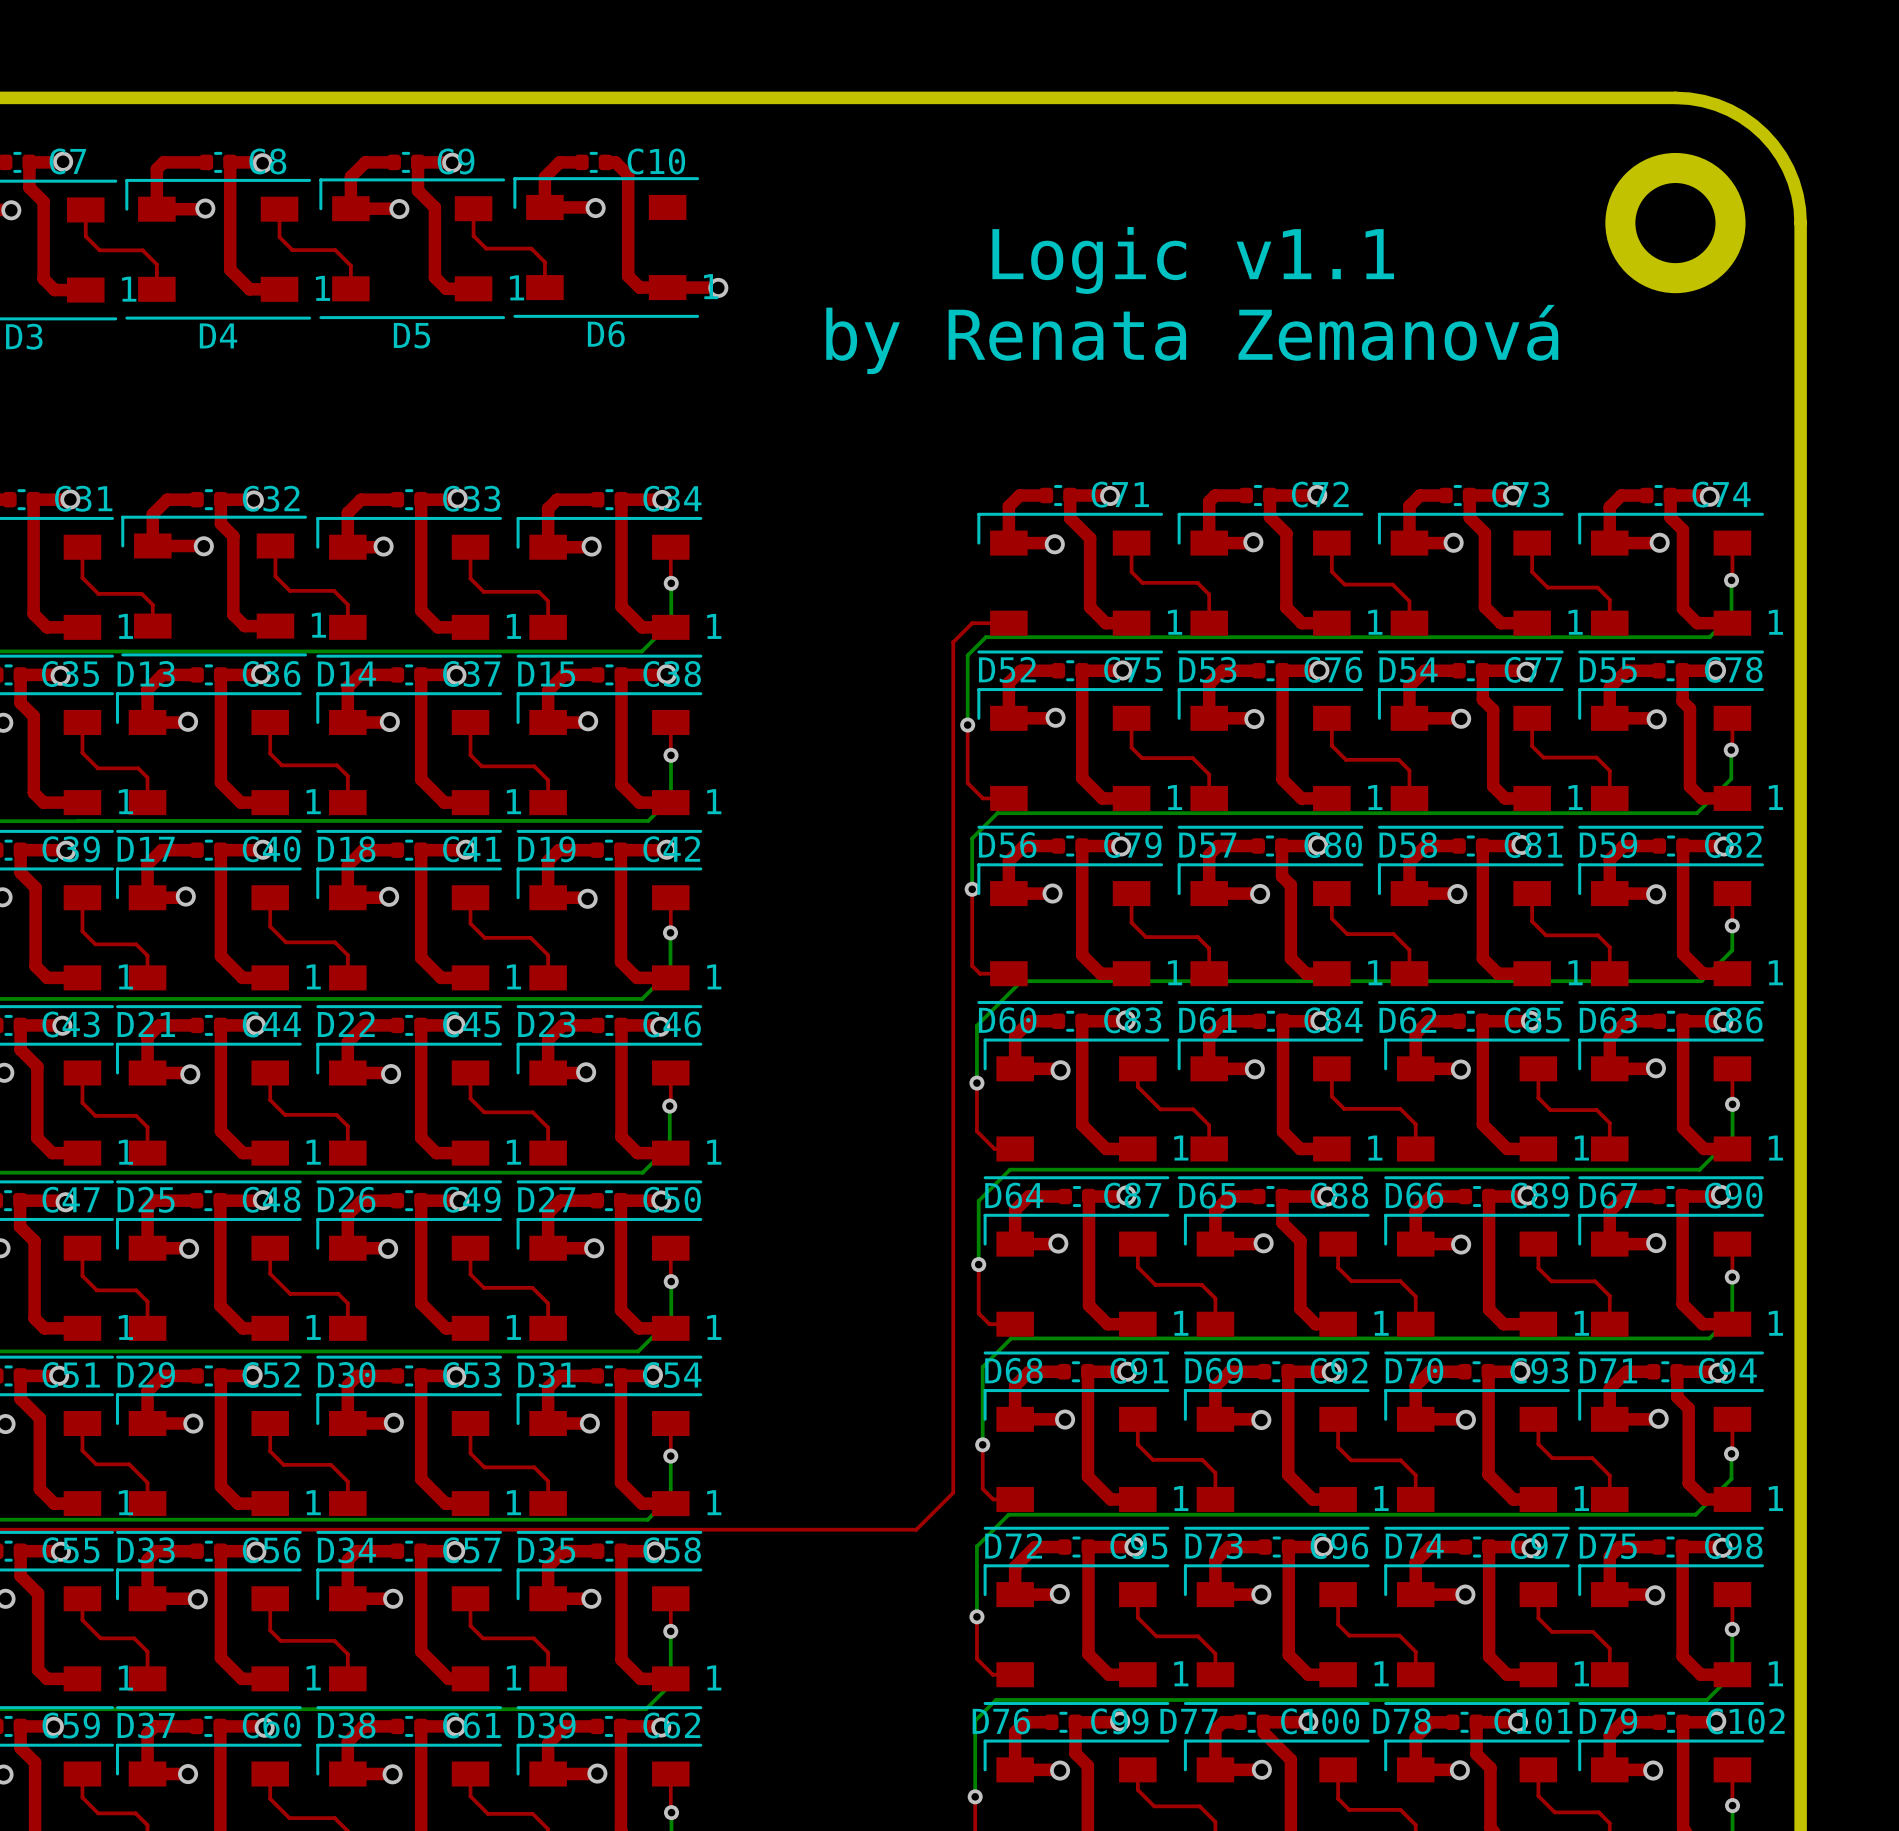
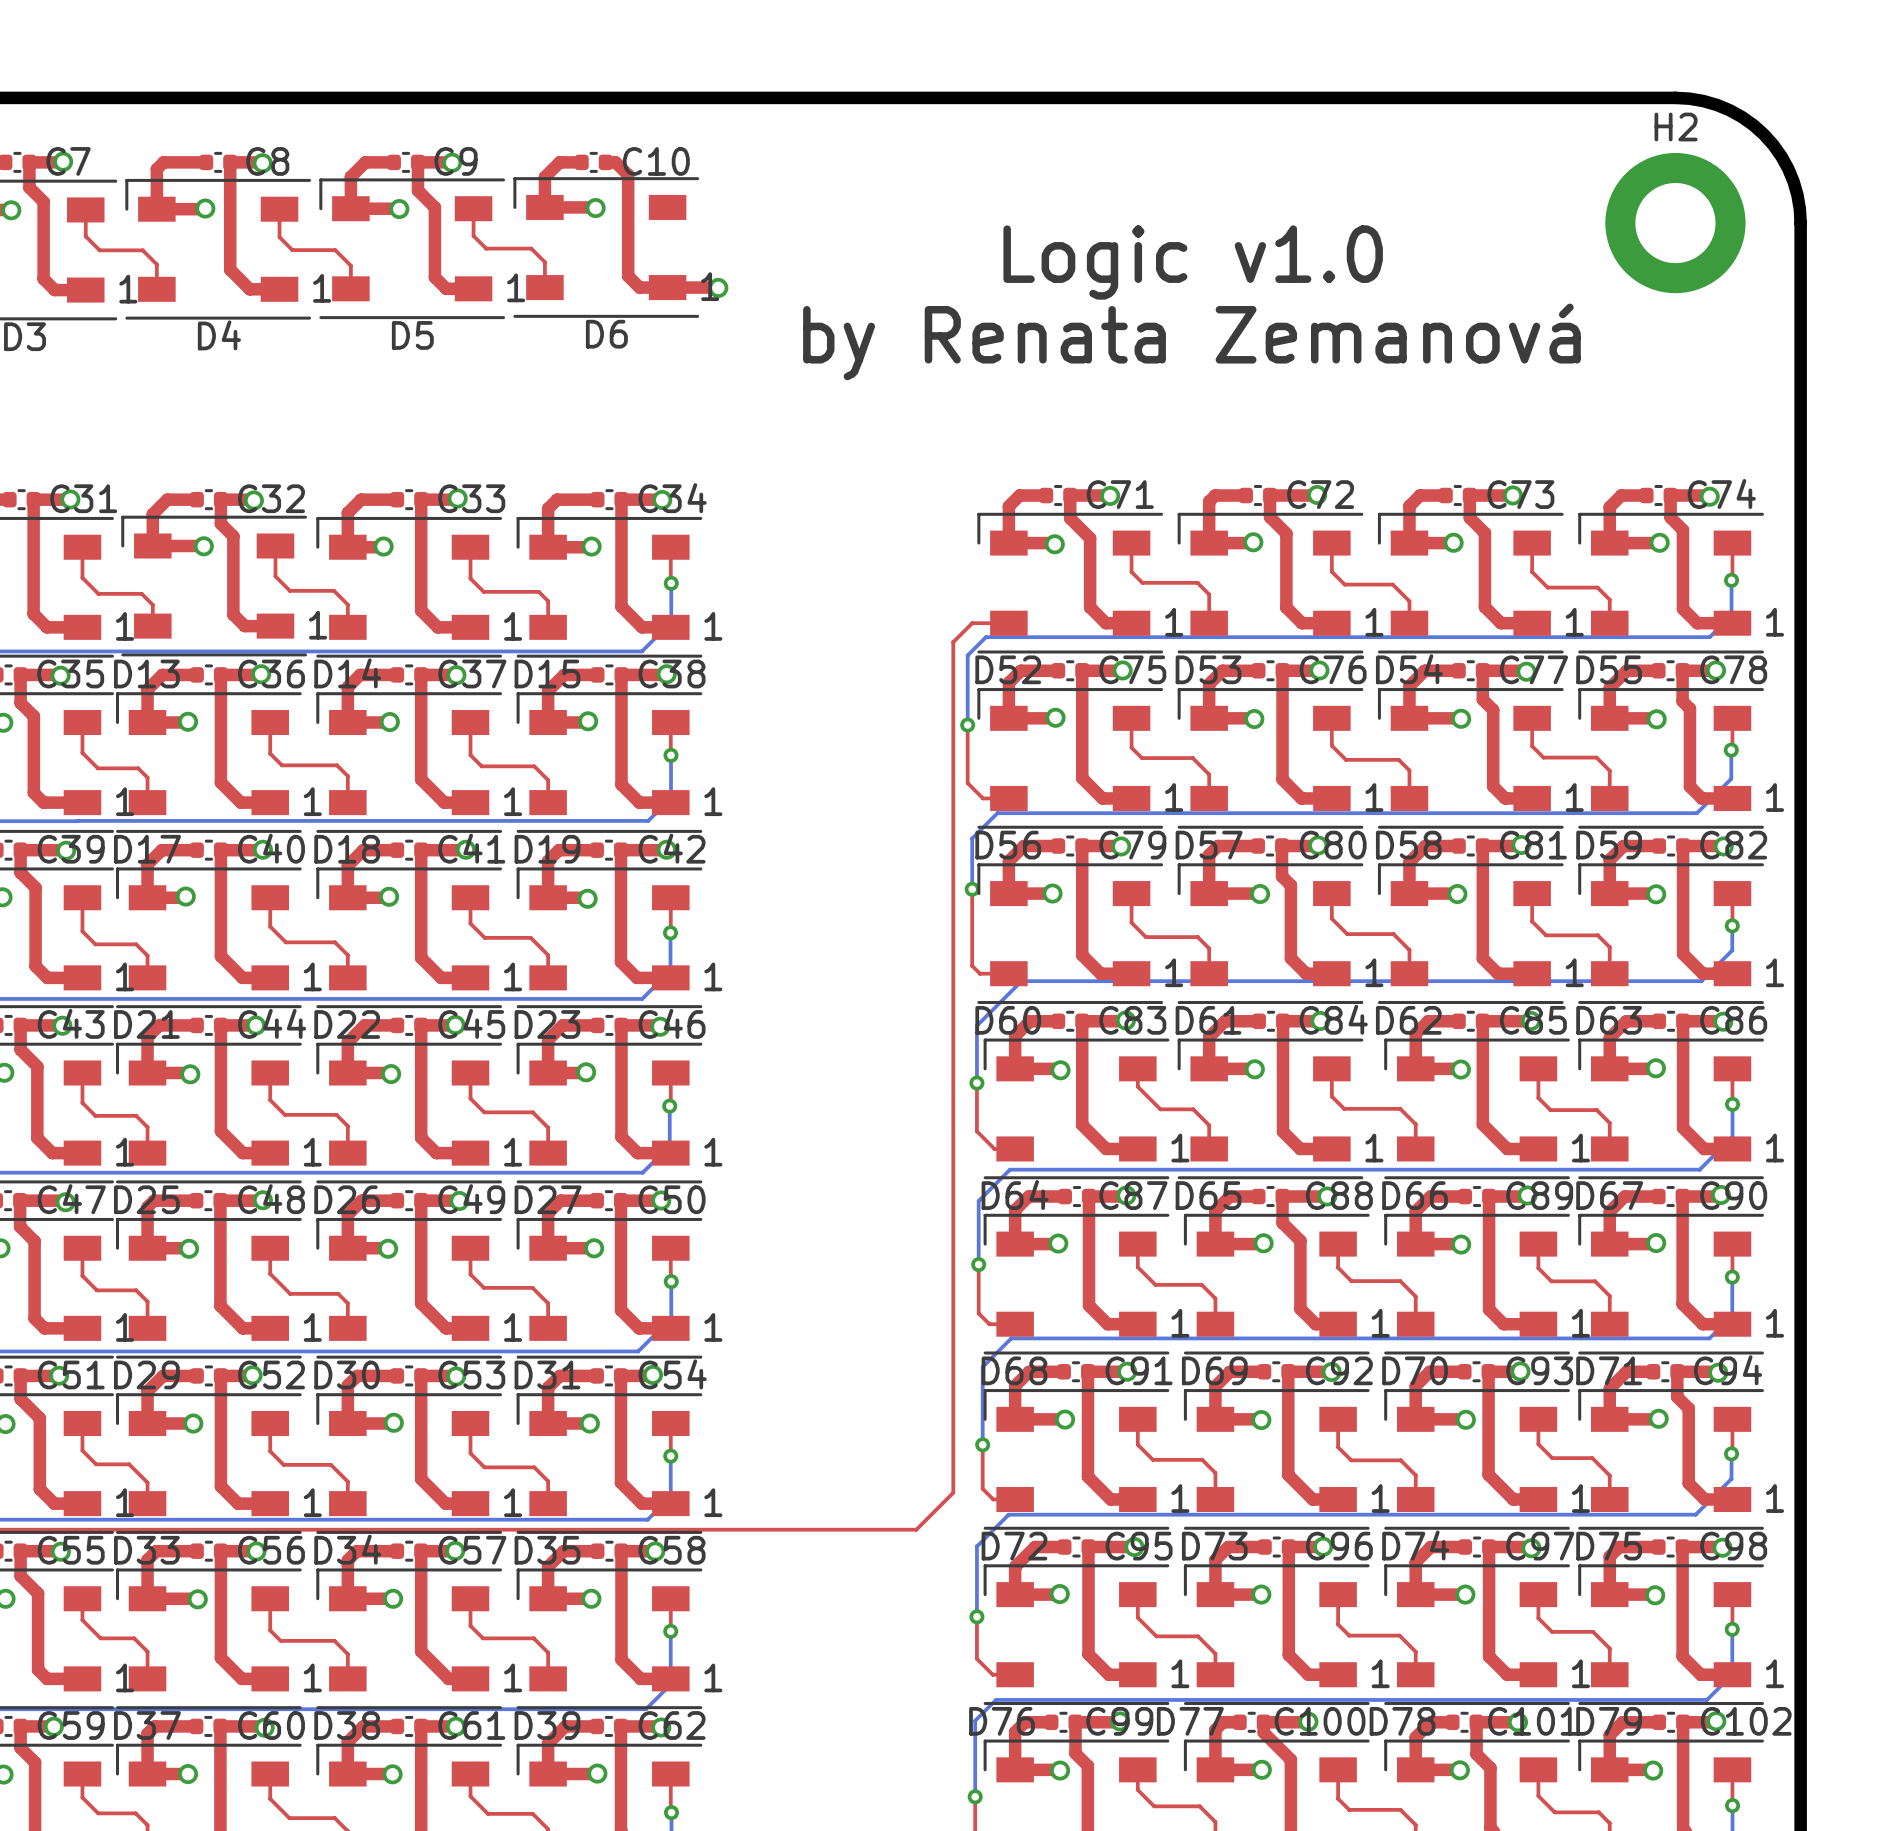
H2 name: none -> H2 (1676, 127)
text: Logic v1.1 (1193, 260) -> Logic v1.0 (1193, 262)

